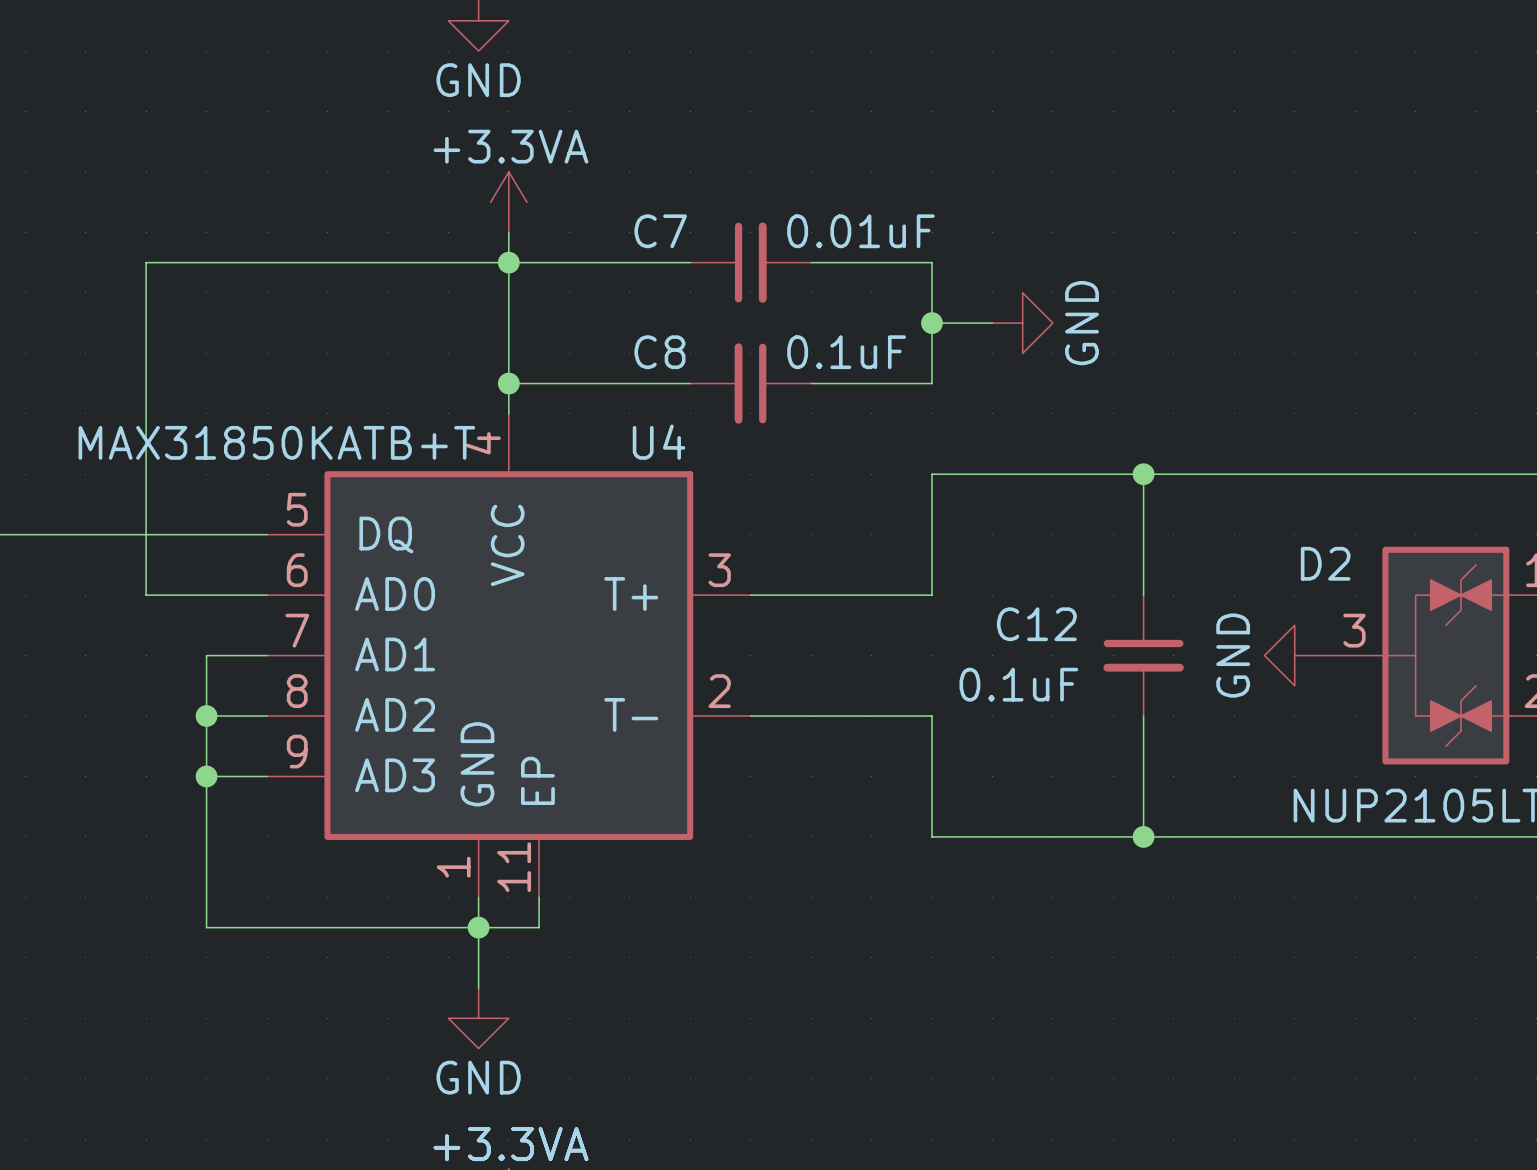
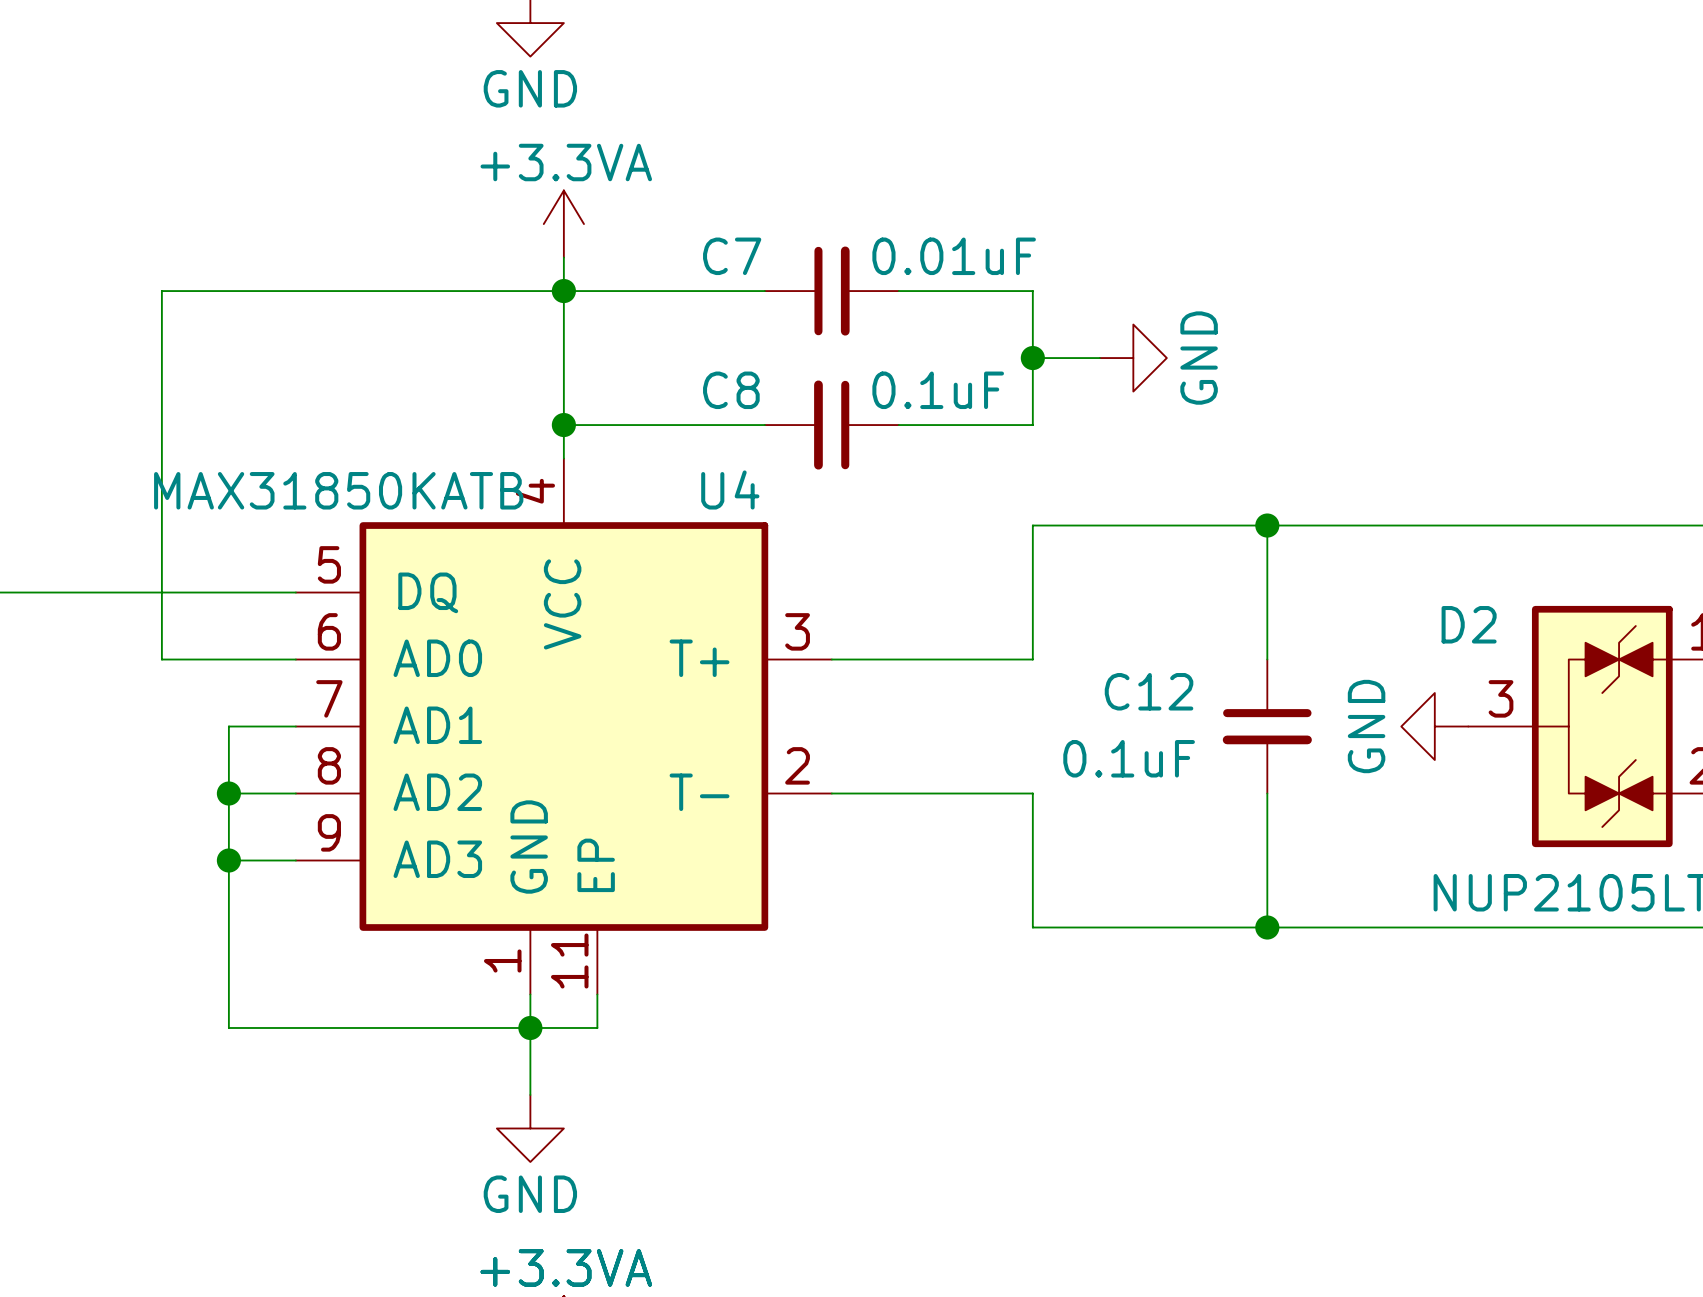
U4 value: MAX31850KATB+T (276, 442) -> MAX31850KATB (338, 490)

